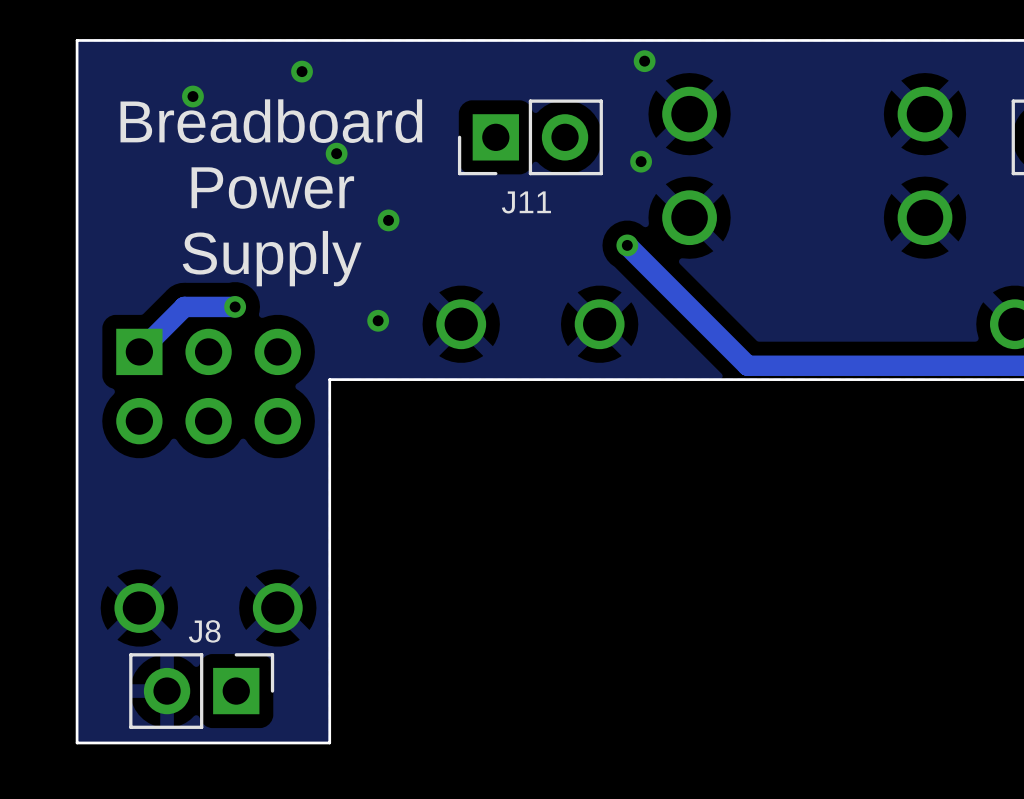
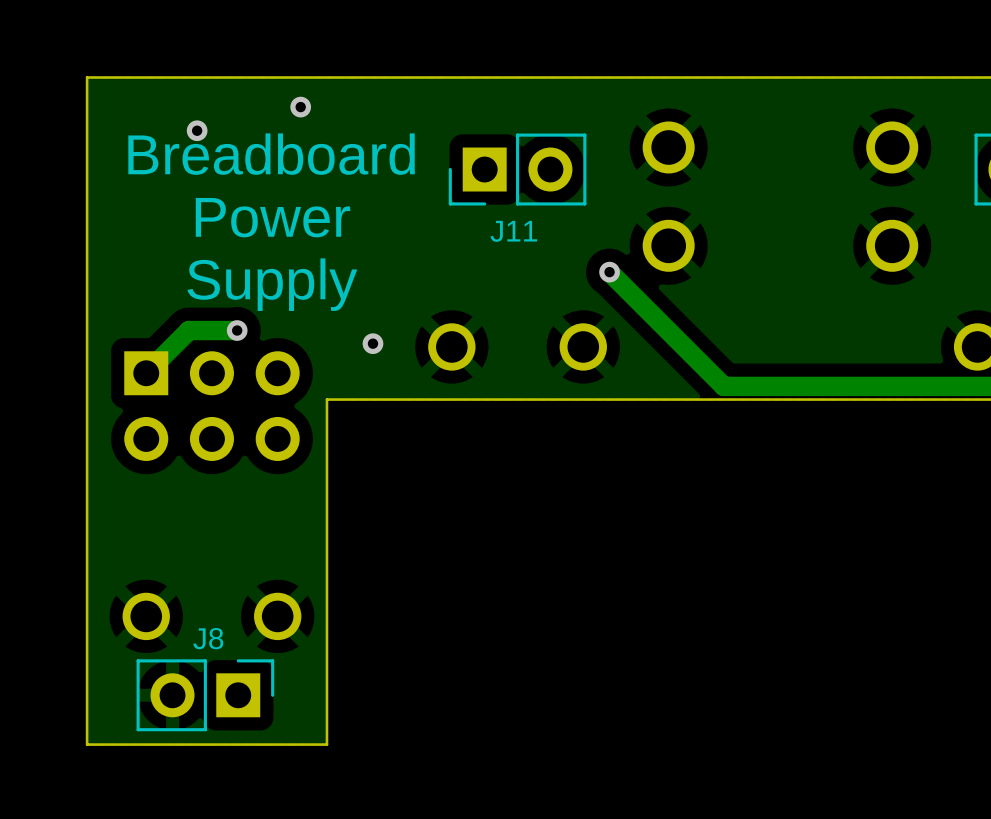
via: (644, 61) -> none
via: (336, 153) -> none
via: (641, 161) -> none
via: (388, 220) -> none

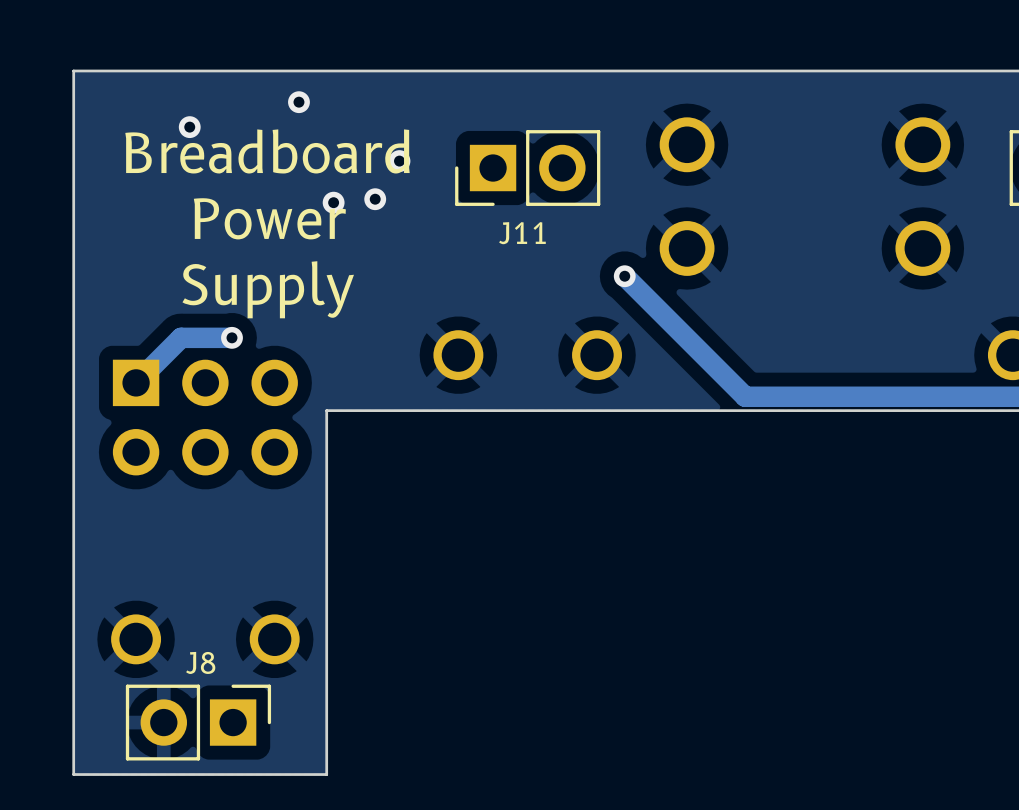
via: none -> (399, 161)
via: none -> (375, 199)
via: none -> (333, 202)
via: (372, 343) -> none

